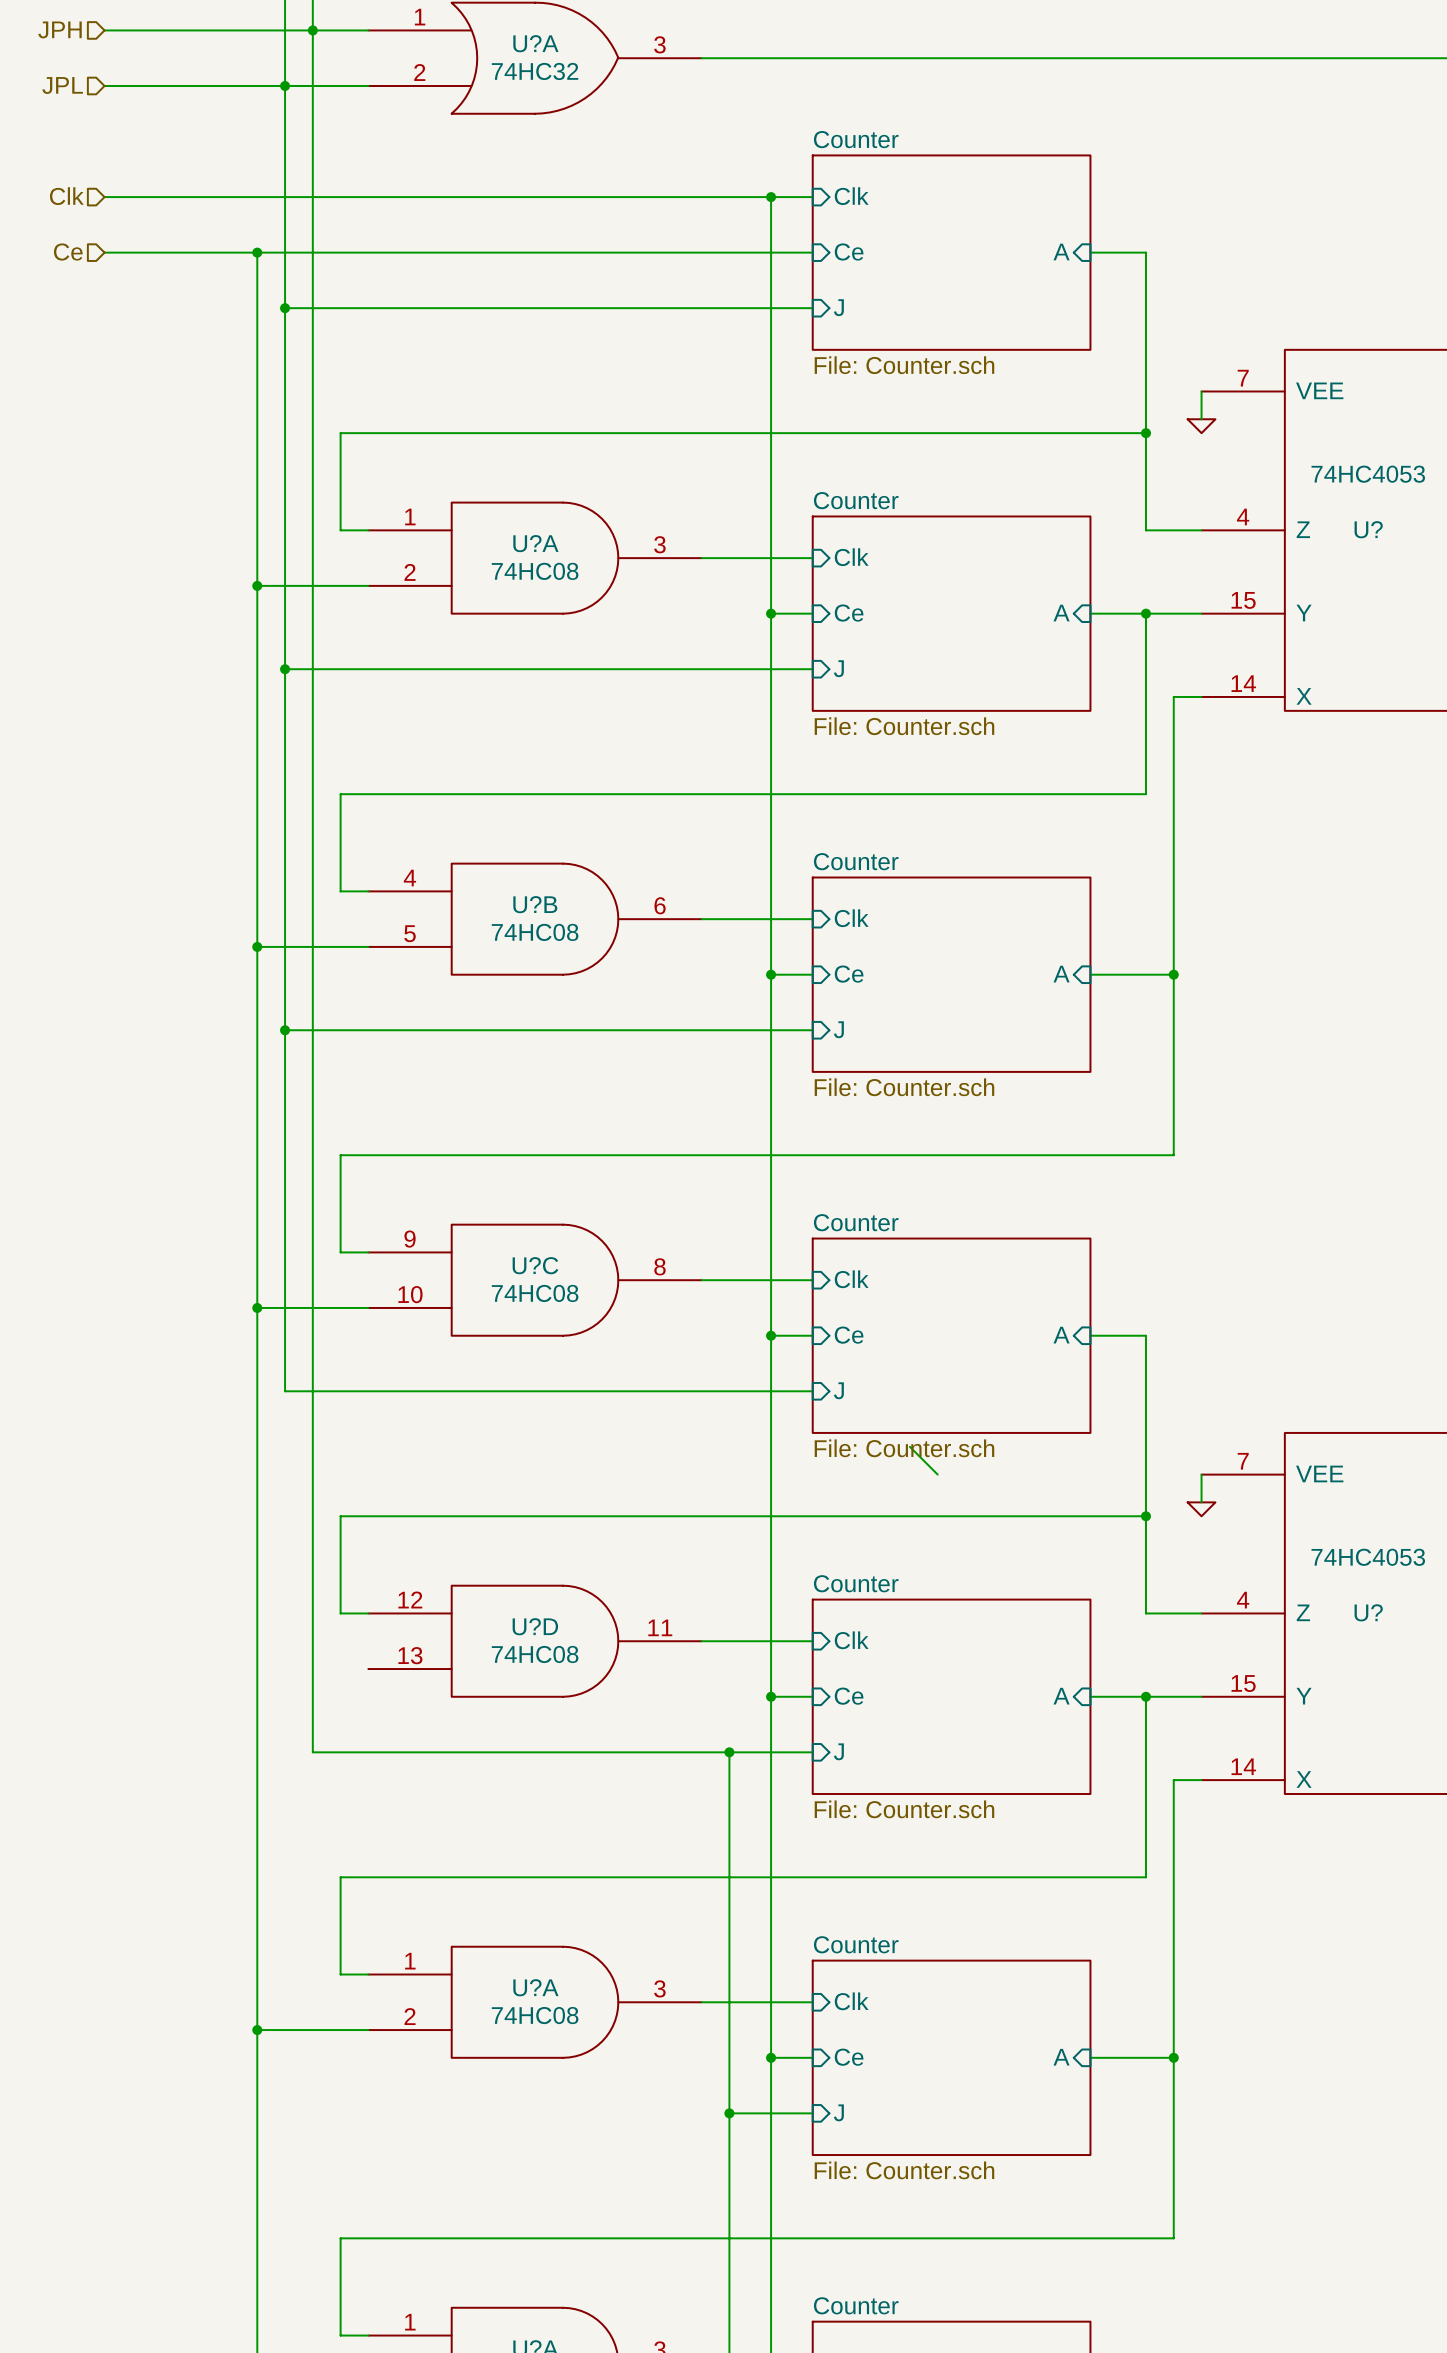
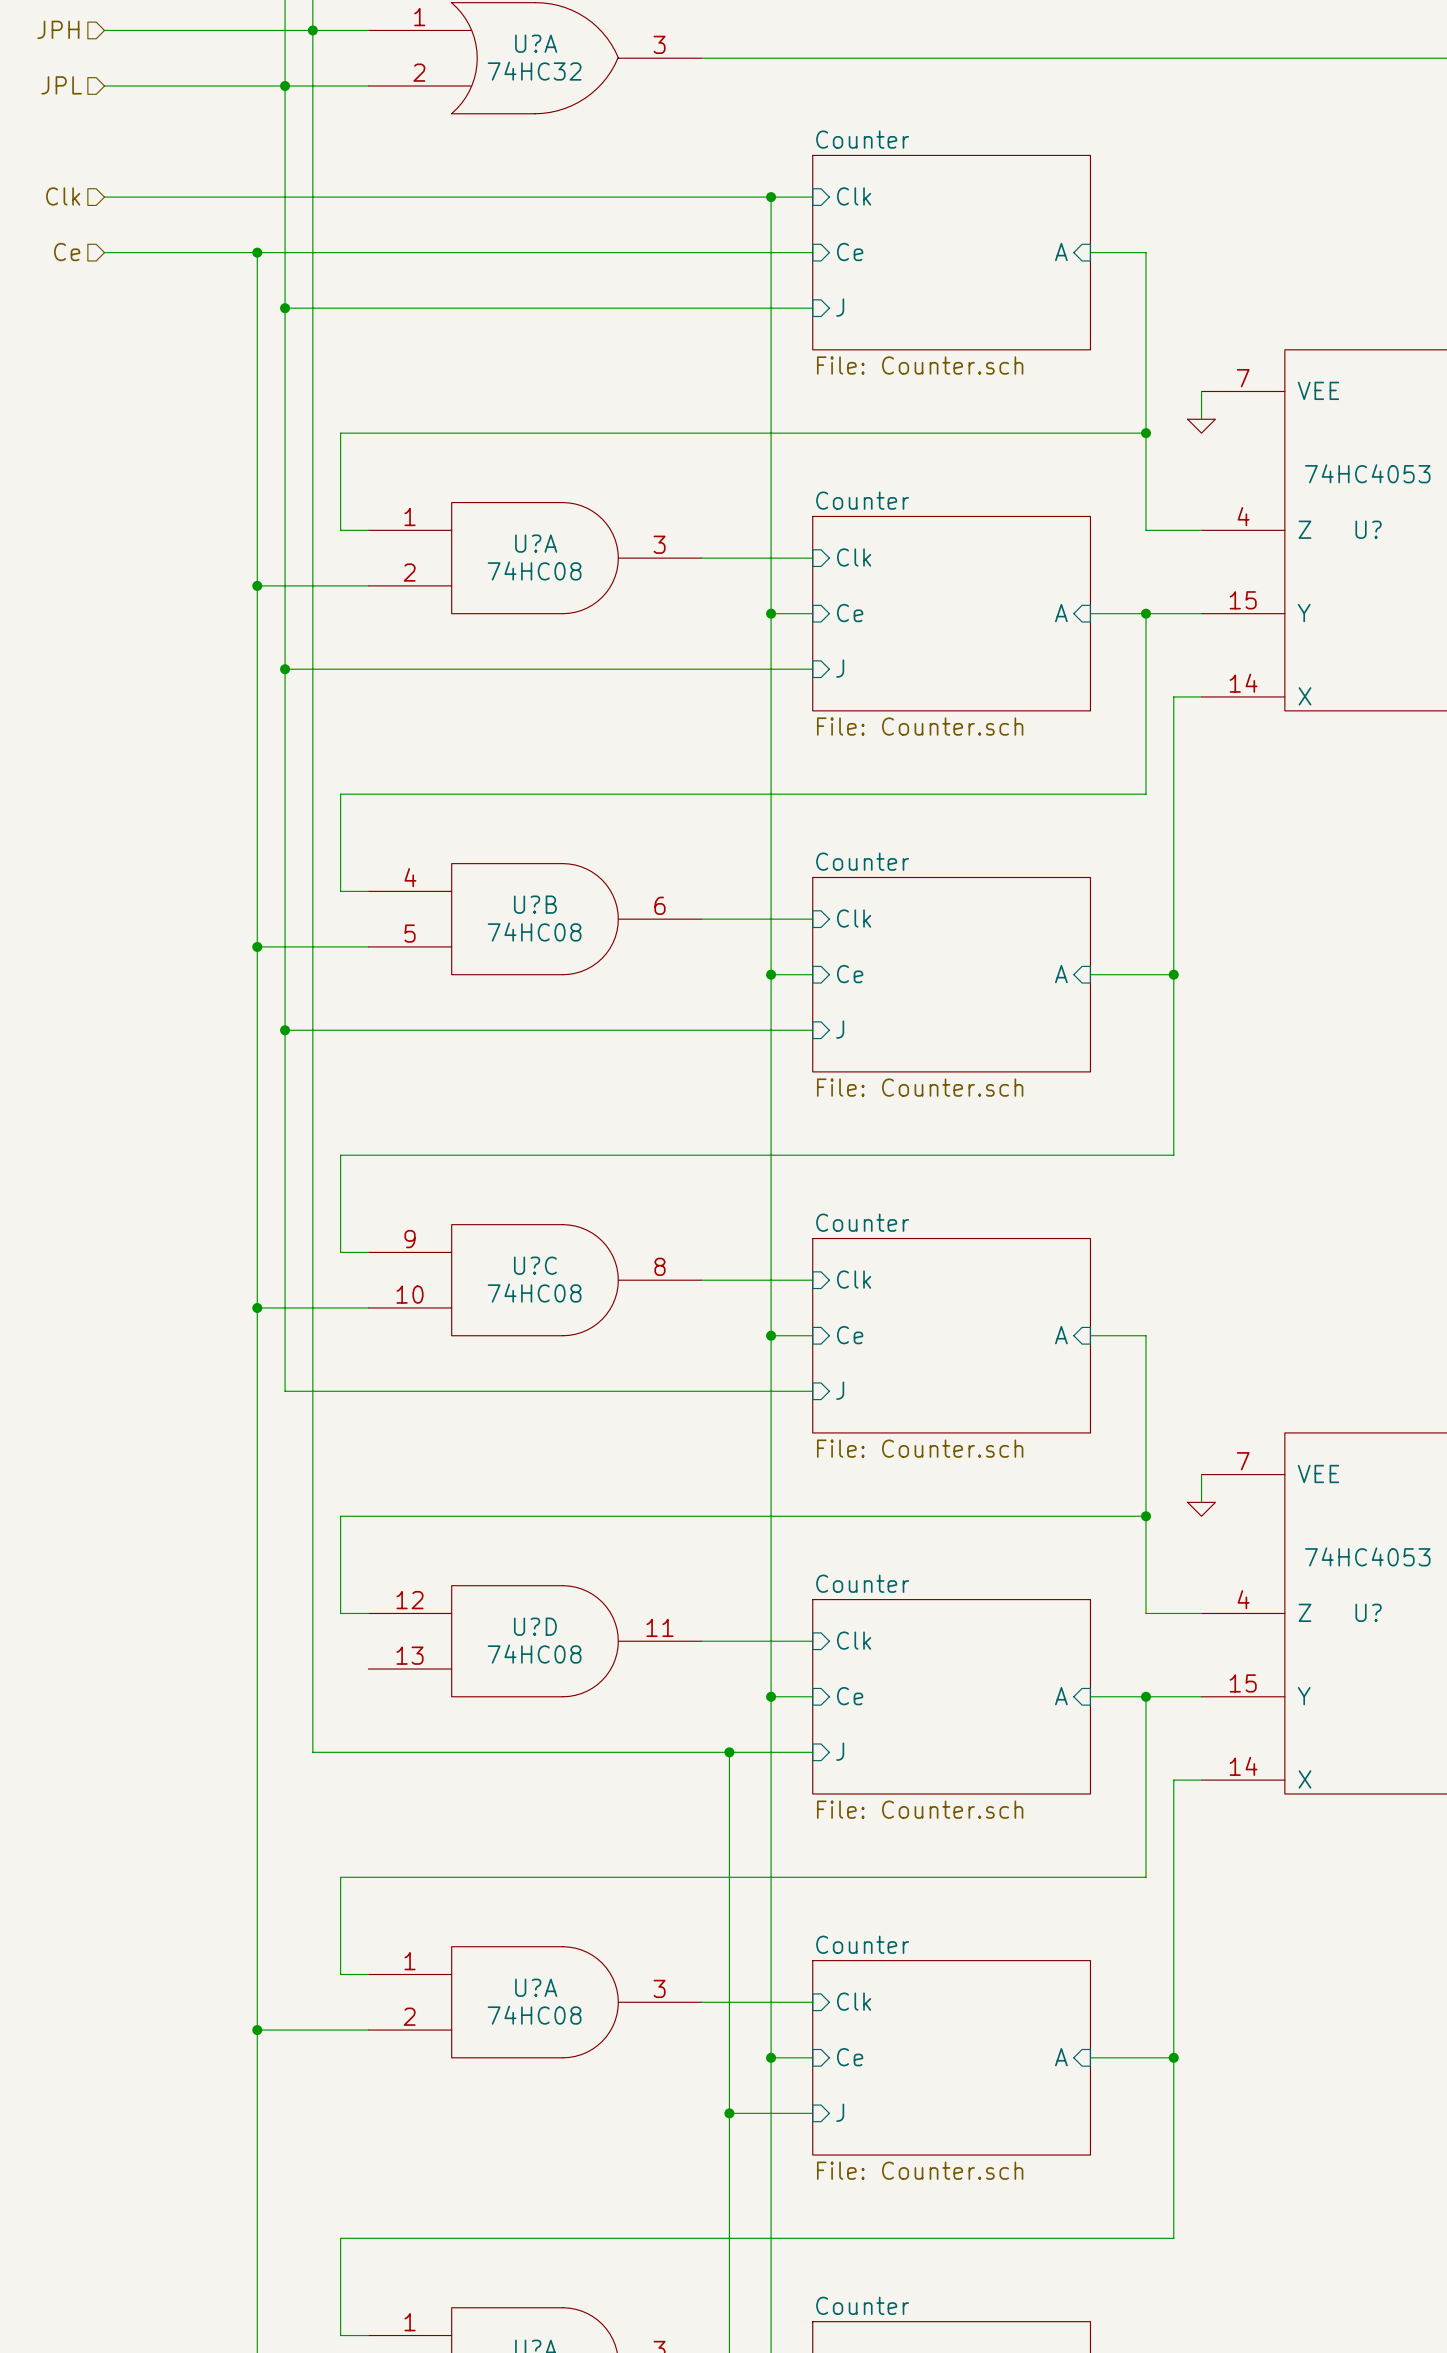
wire: (909, 1446) (937, 1474) -> none

